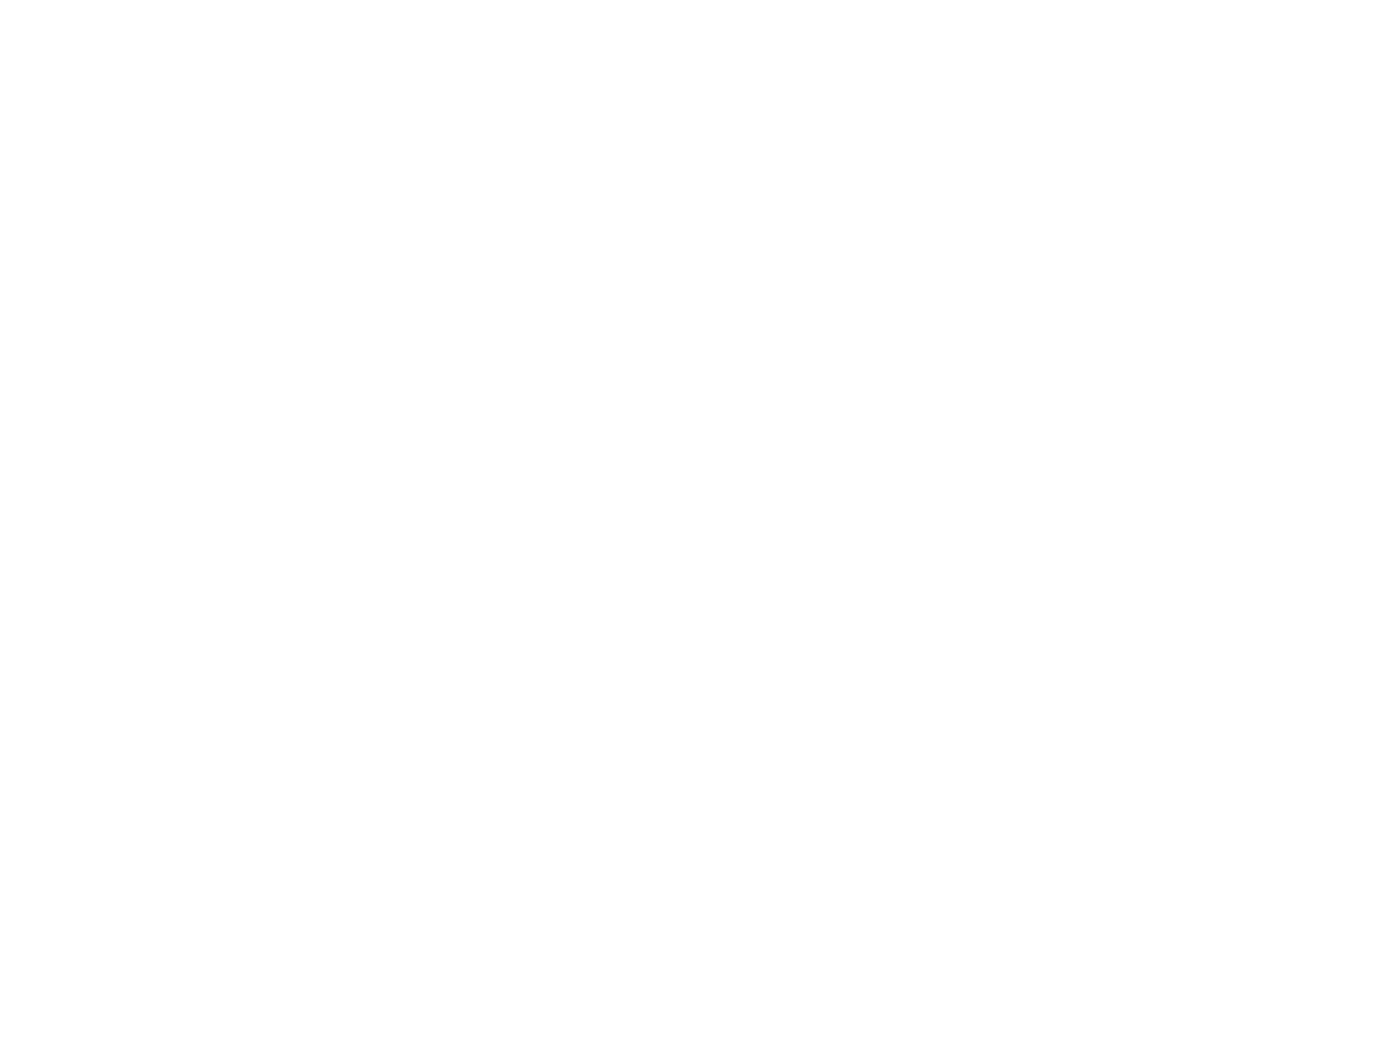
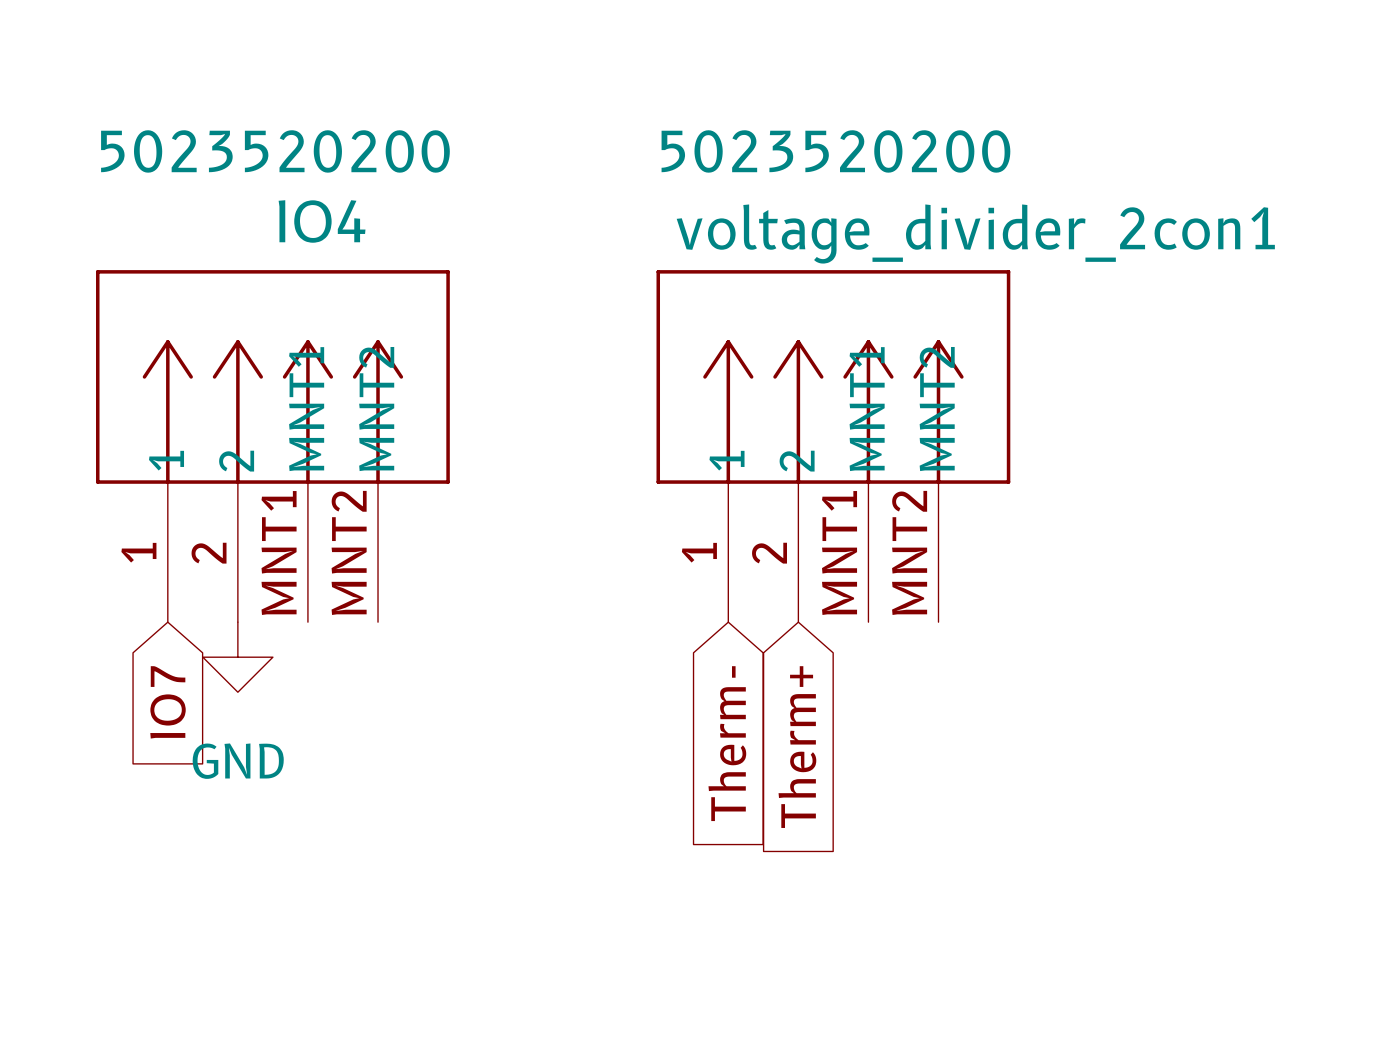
IO4: none -> 5023520200 (272, 446)
voltage_divider_2con1: none -> 5023520200 (833, 446)
power symbol: none -> GND (237, 657)
global label: none -> IO7 (168, 702)
global label: none -> Therm- (727, 743)
global label: none -> Therm+ (797, 747)

